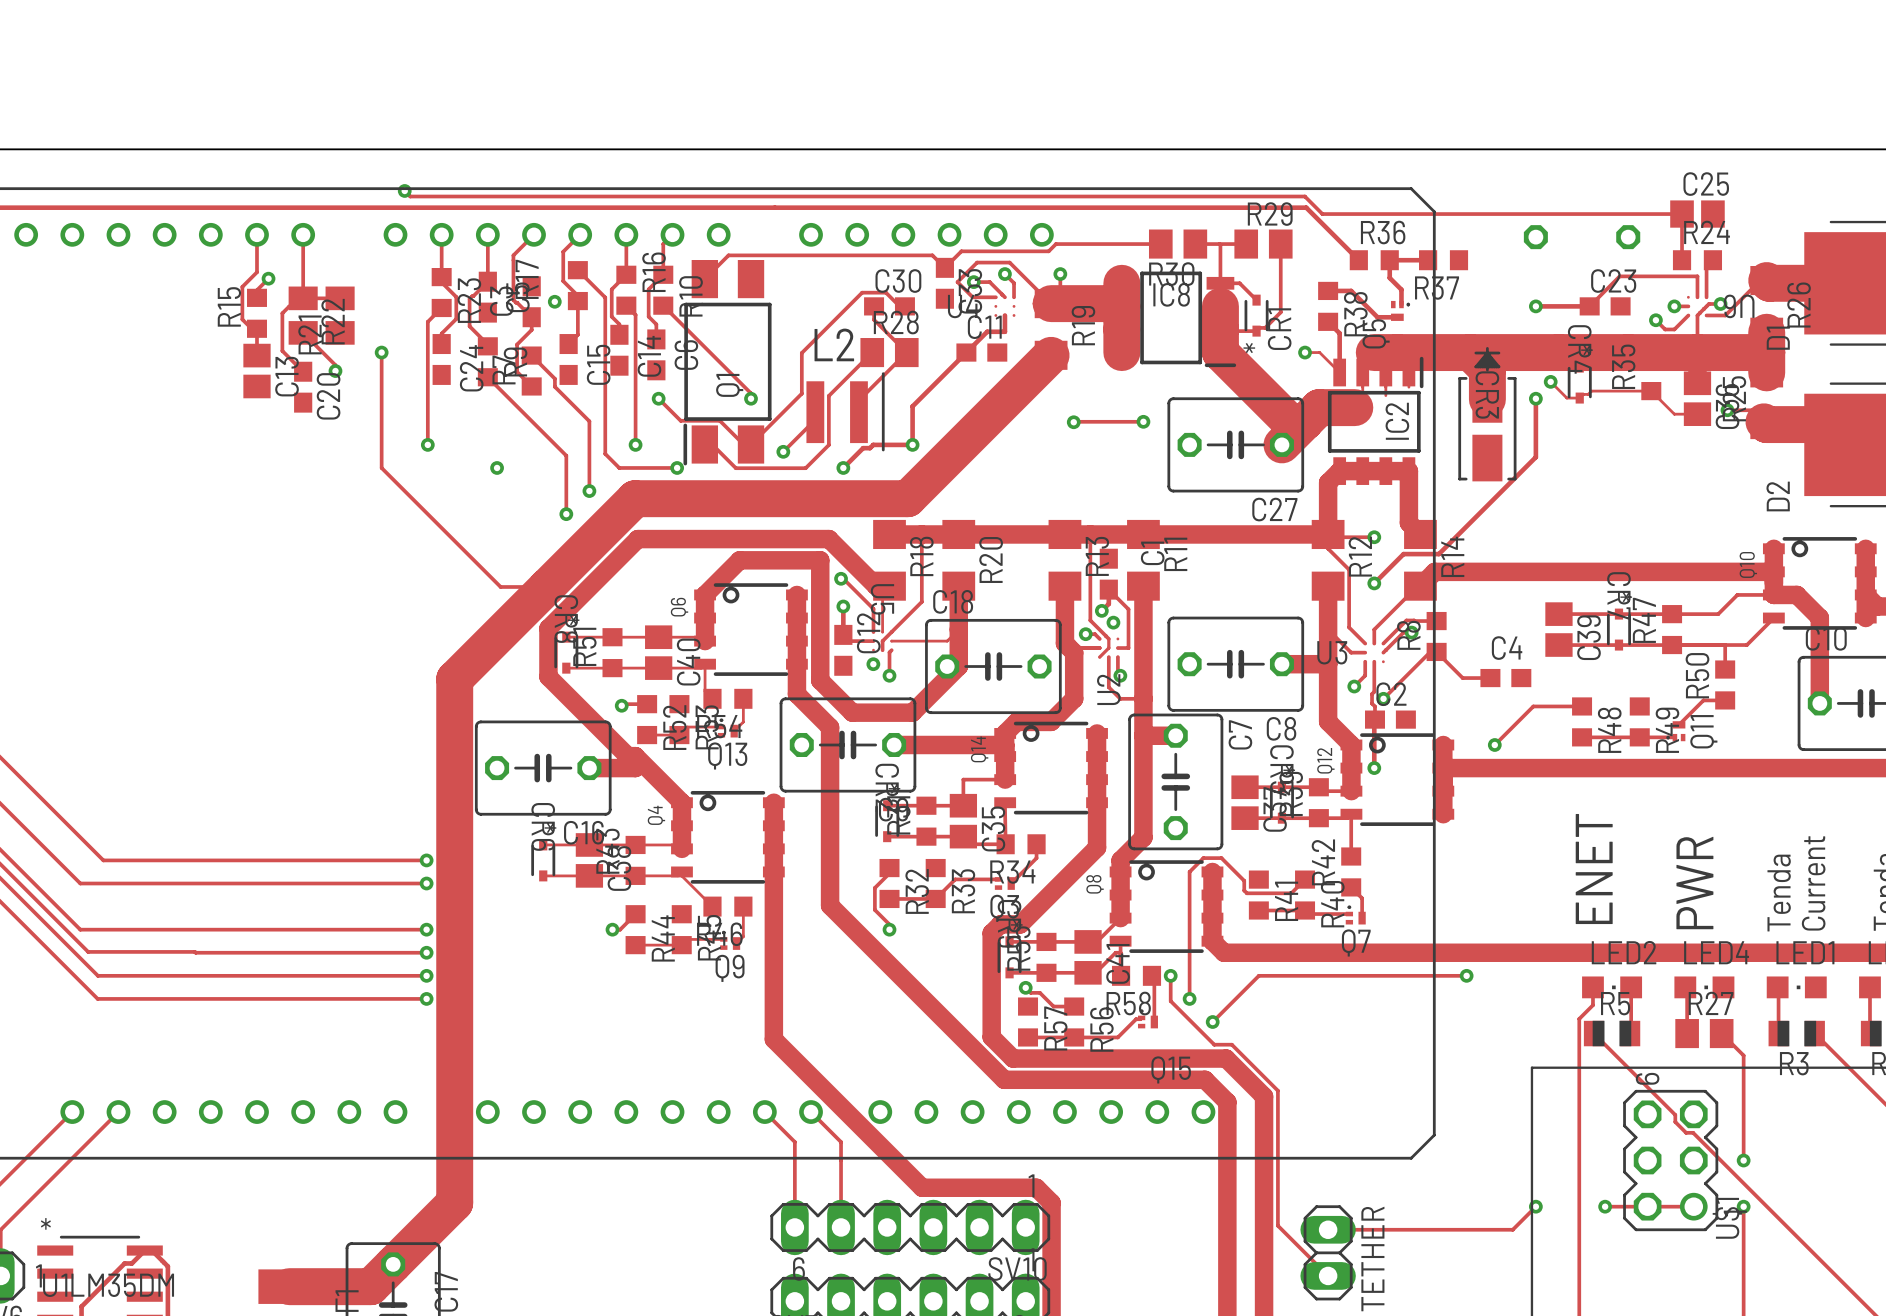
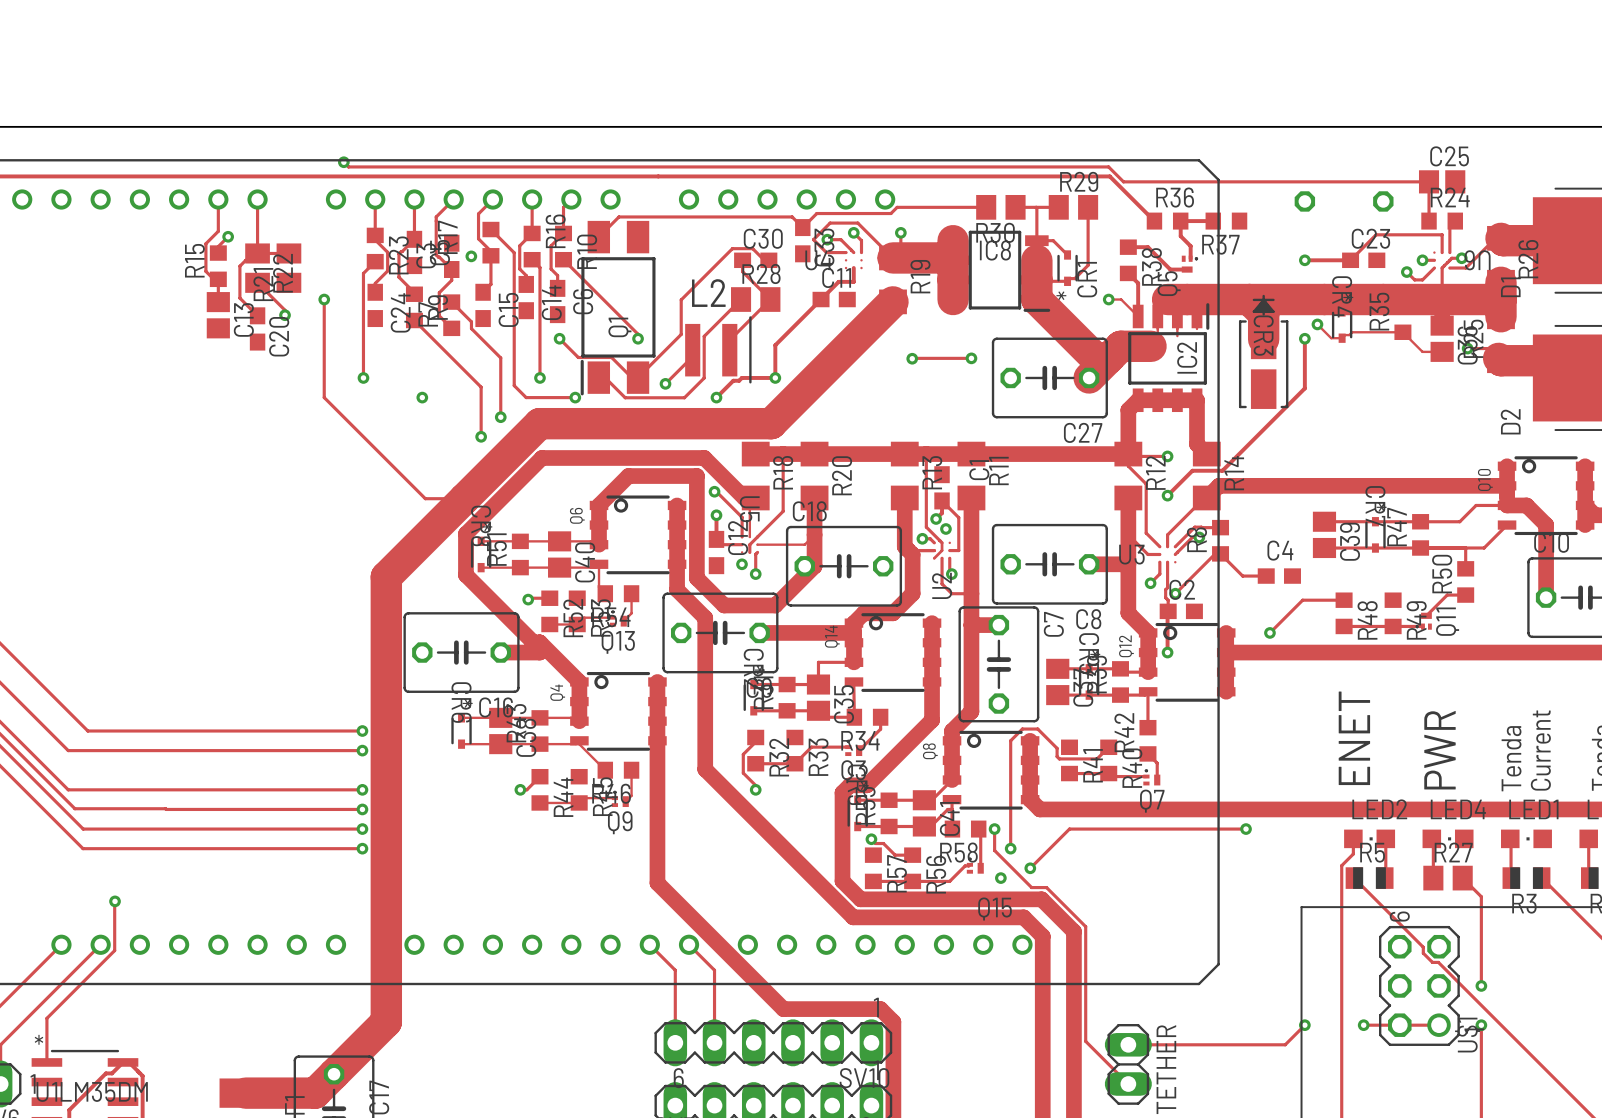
via: none -> (1000, 878)
track: none -> (115, 901) (114, 950) (46, 1018) (46, 1062)
via: none -> (115, 901)

